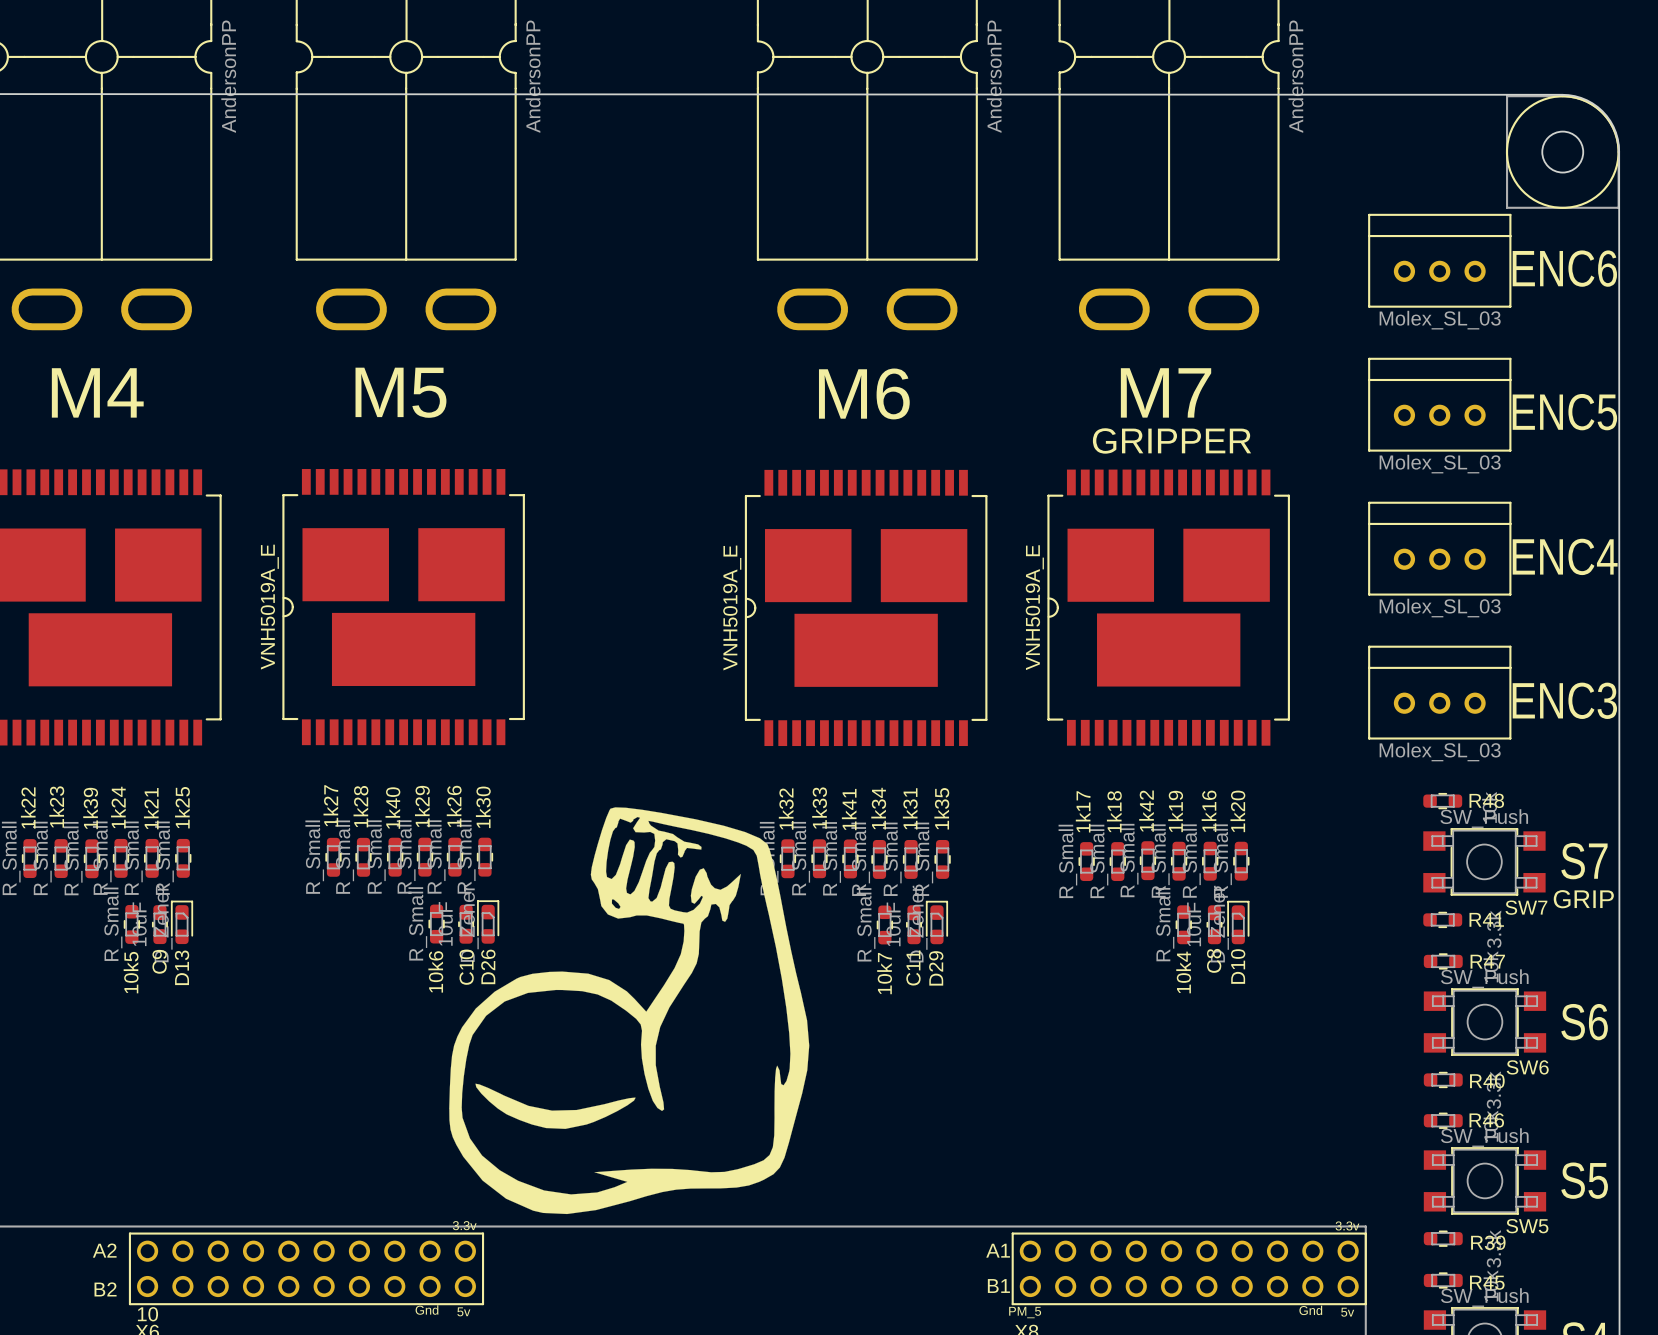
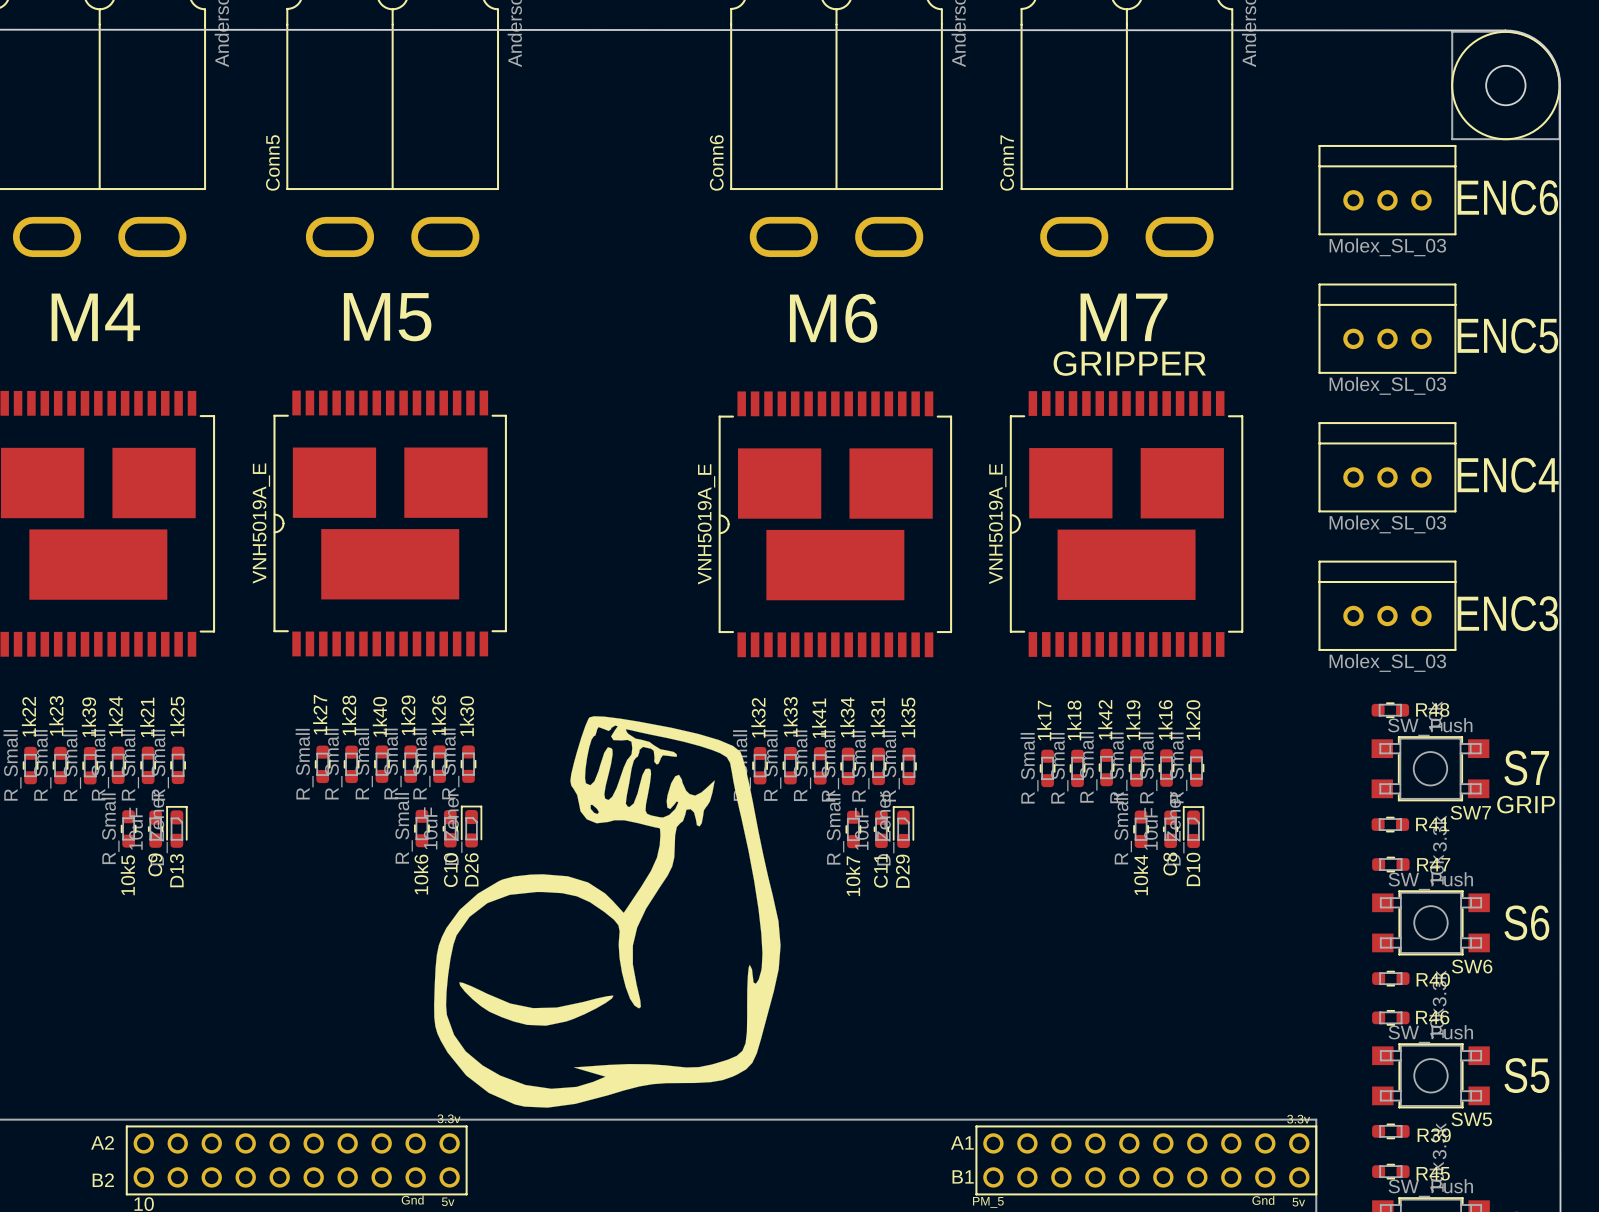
Conn5 name: none -> Conn5 (272, 162)
Conn6 name: none -> Conn6 (716, 162)
Conn7 name: none -> Conn7 (1007, 163)

